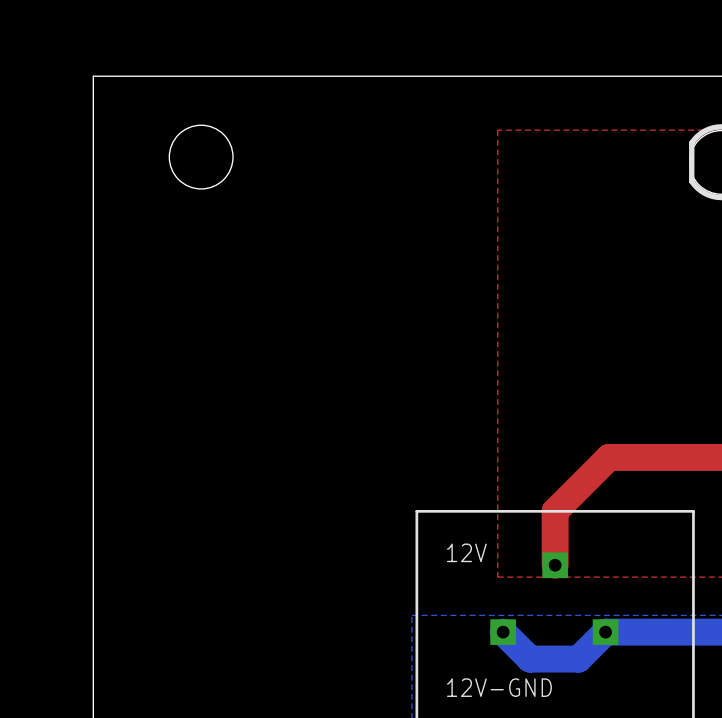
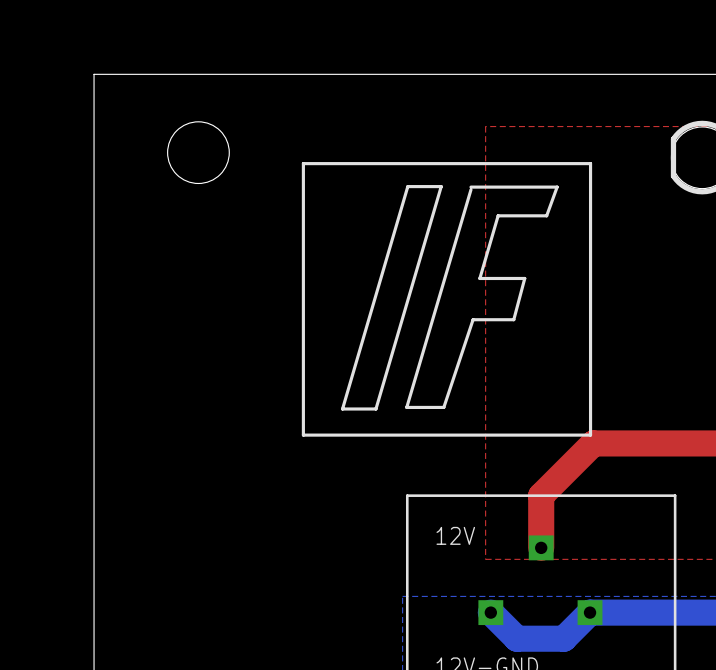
line: none -> (303, 163) (303, 435) (590, 435) (590, 163) (303, 163)
line: none -> (407, 186) (342, 409) (375, 409) (441, 186) (407, 186)
line: none -> (470, 187) (557, 187) (546, 215) (498, 215) (479, 278) (524, 278) (513, 319) (473, 319) (443, 407) (406, 407) (470, 189)

